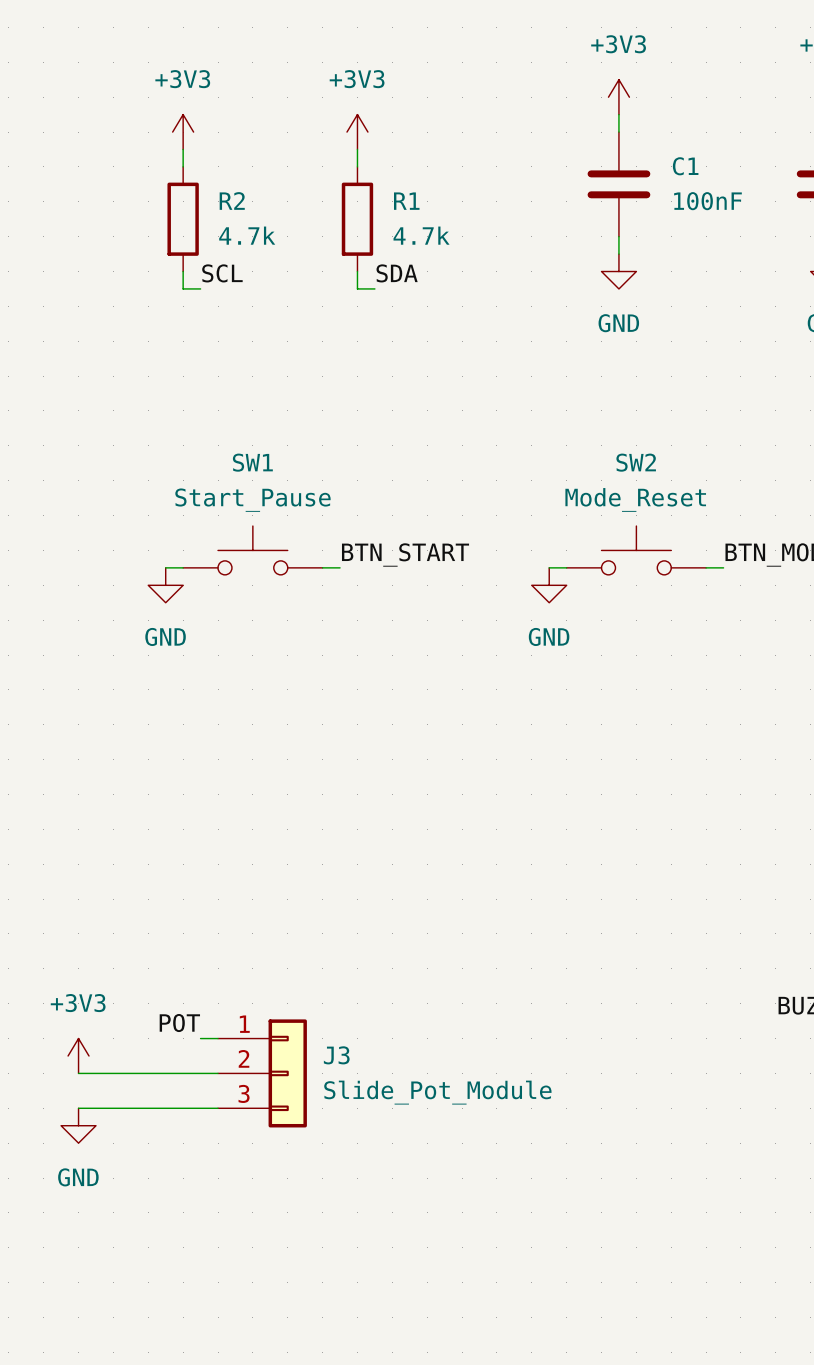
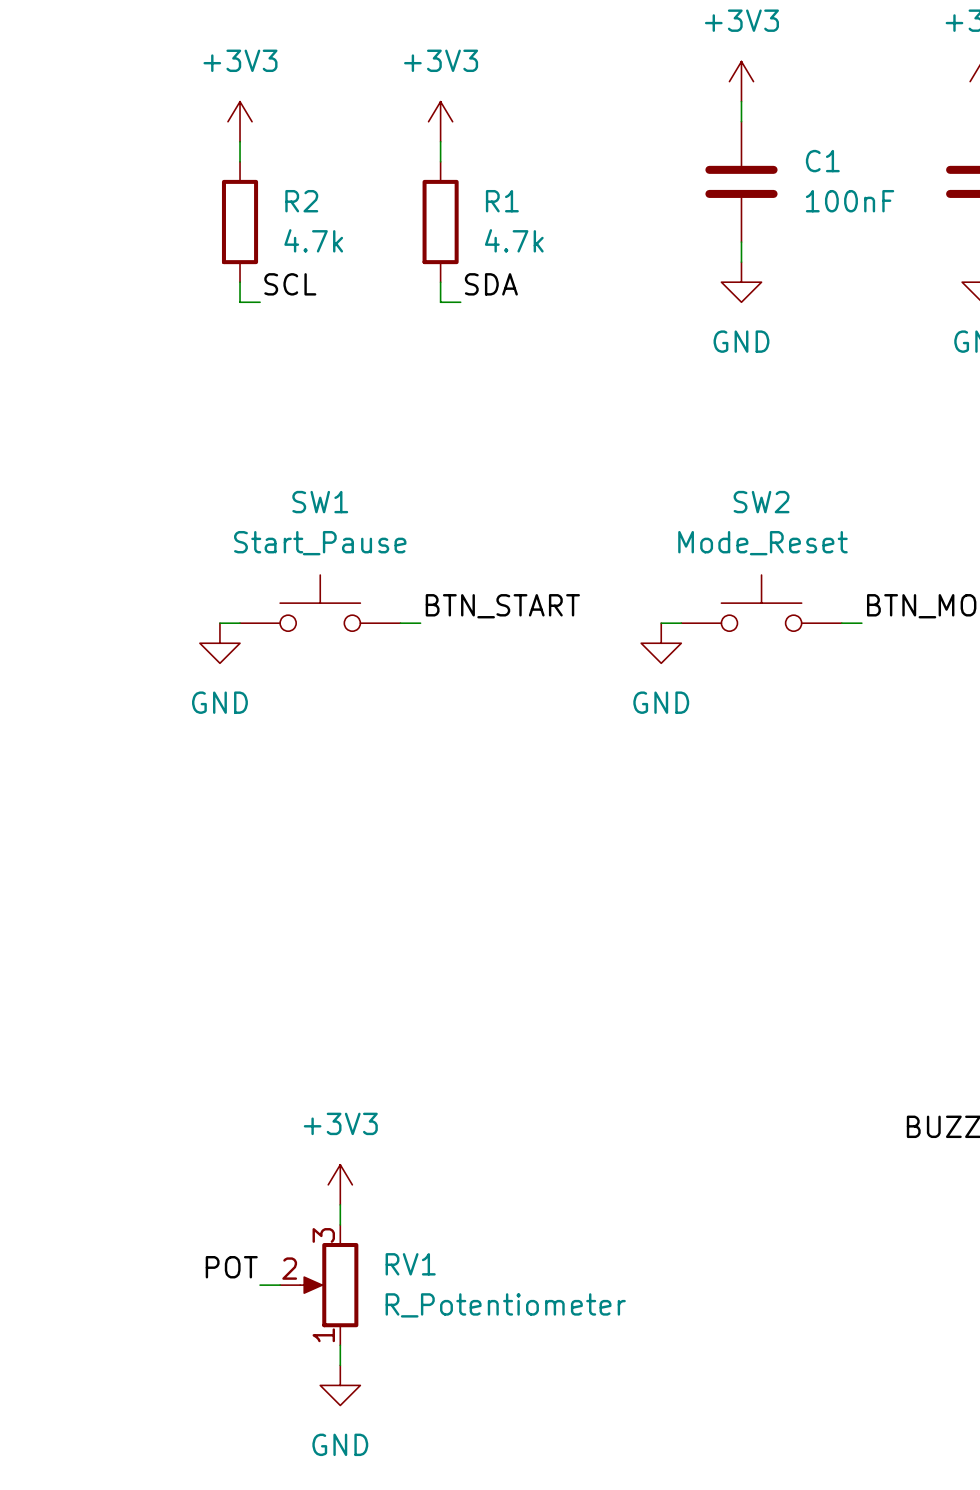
label position: POT (179, 1023) -> POT (231, 1267)
wire: (200, 1038) (218, 1038) -> (260, 1285) (280, 1285)
power symbol position: +3V3 (78, 1055) -> +3V3 (340, 1184)
wire: (78, 1073) (218, 1073) -> none
J3: Slide_Pot_Module (262, 1073) -> none
wire: (78, 1108) (218, 1108) -> none
power symbol position: GND (78, 1125) -> GND (340, 1385)
RV1: none -> R_Potentiometer (319, 1285)
wire: none -> (340, 1345) (340, 1365)

